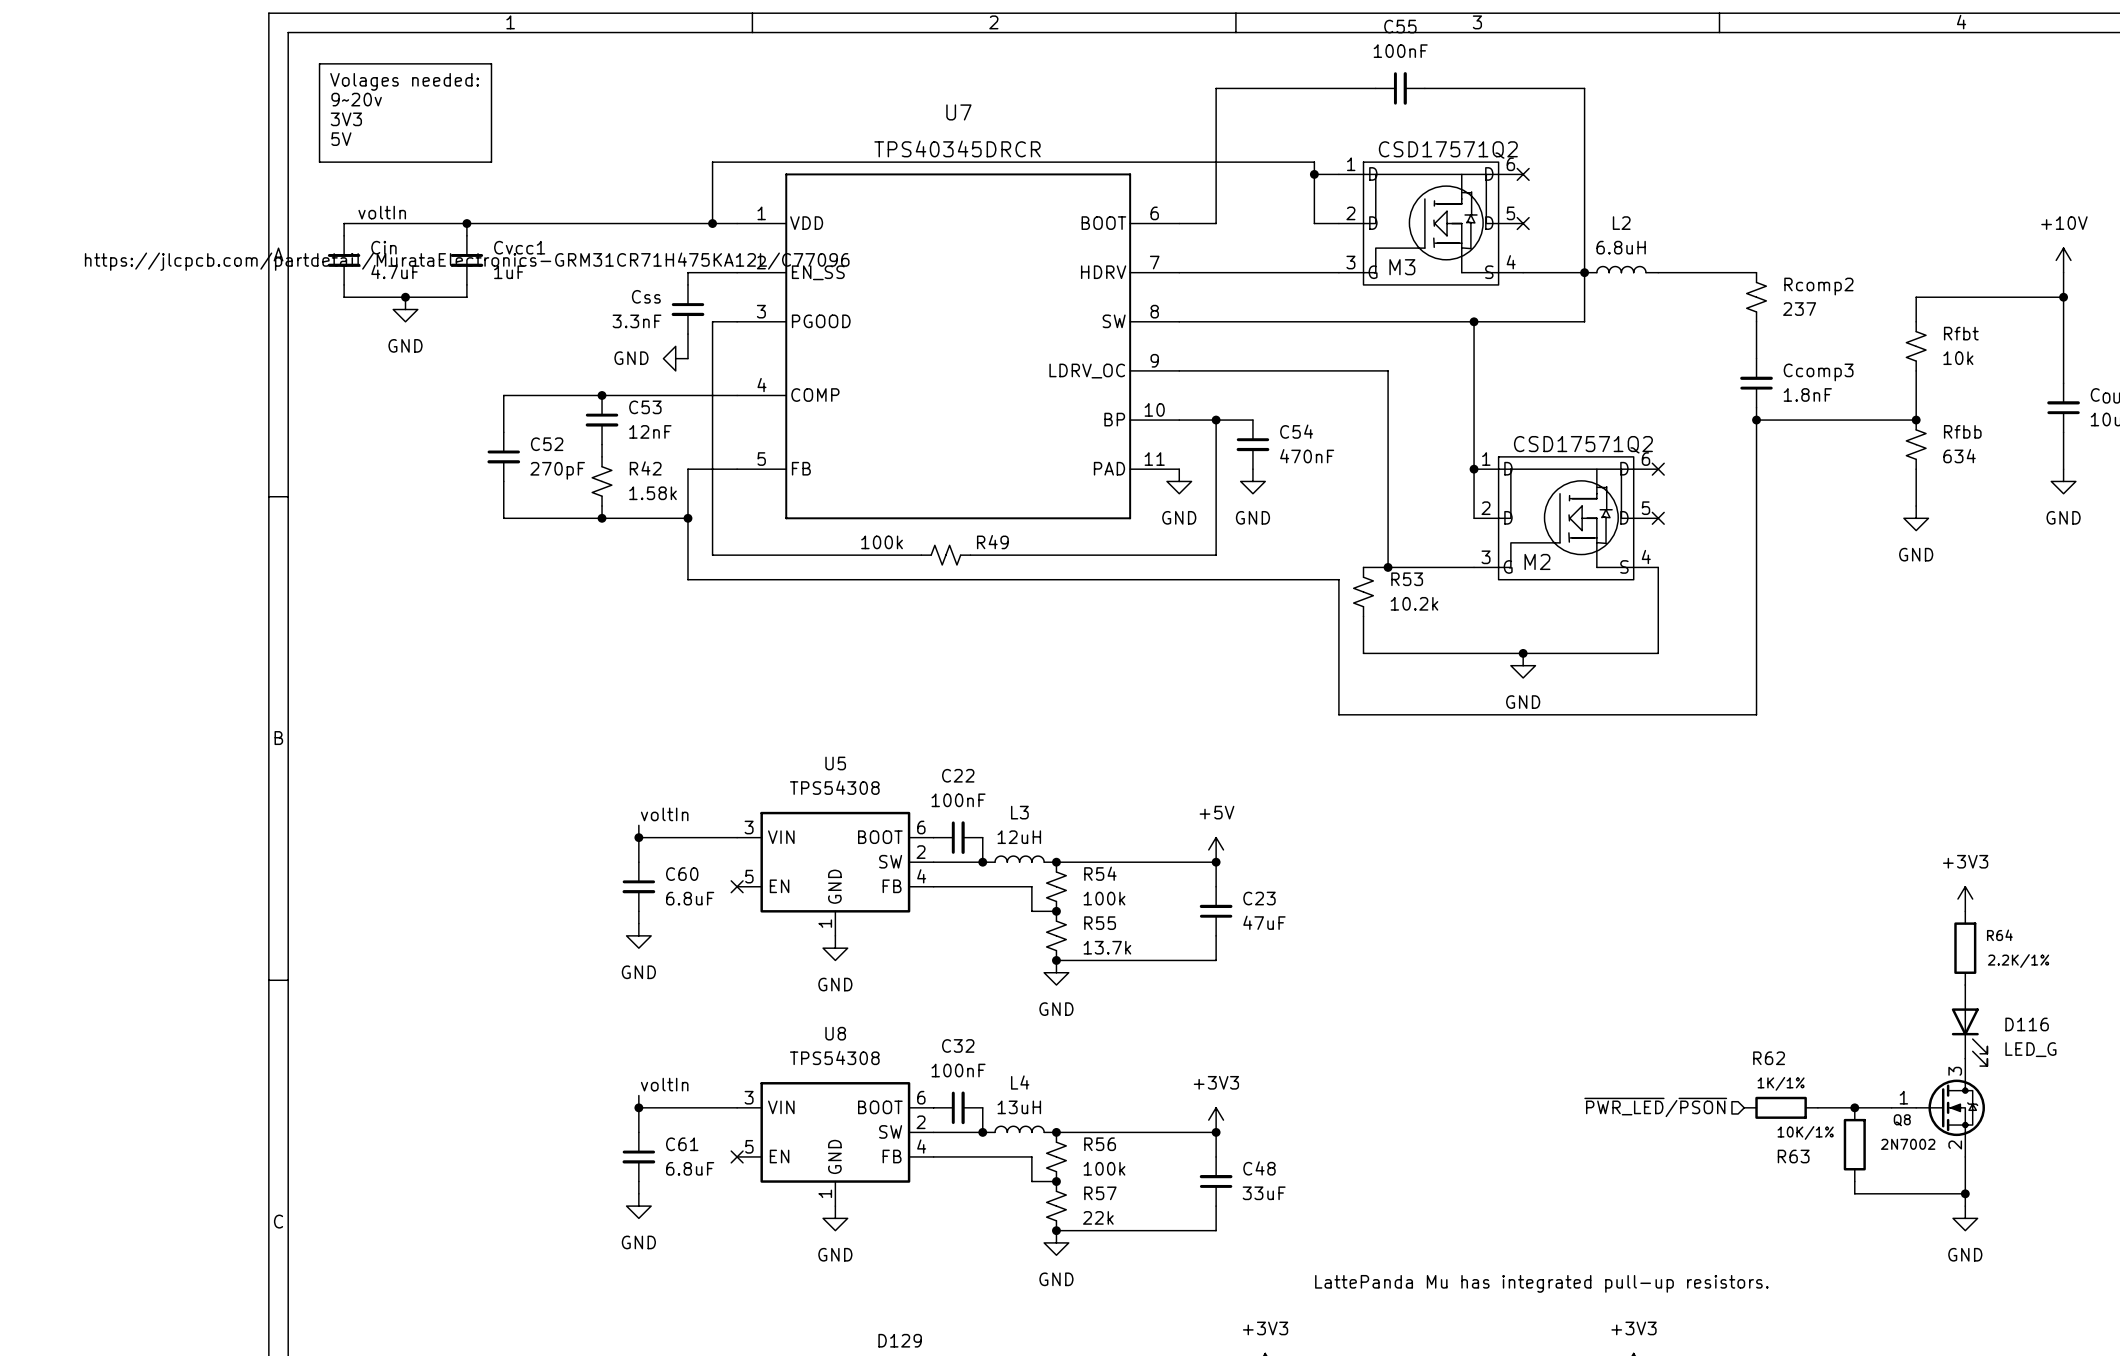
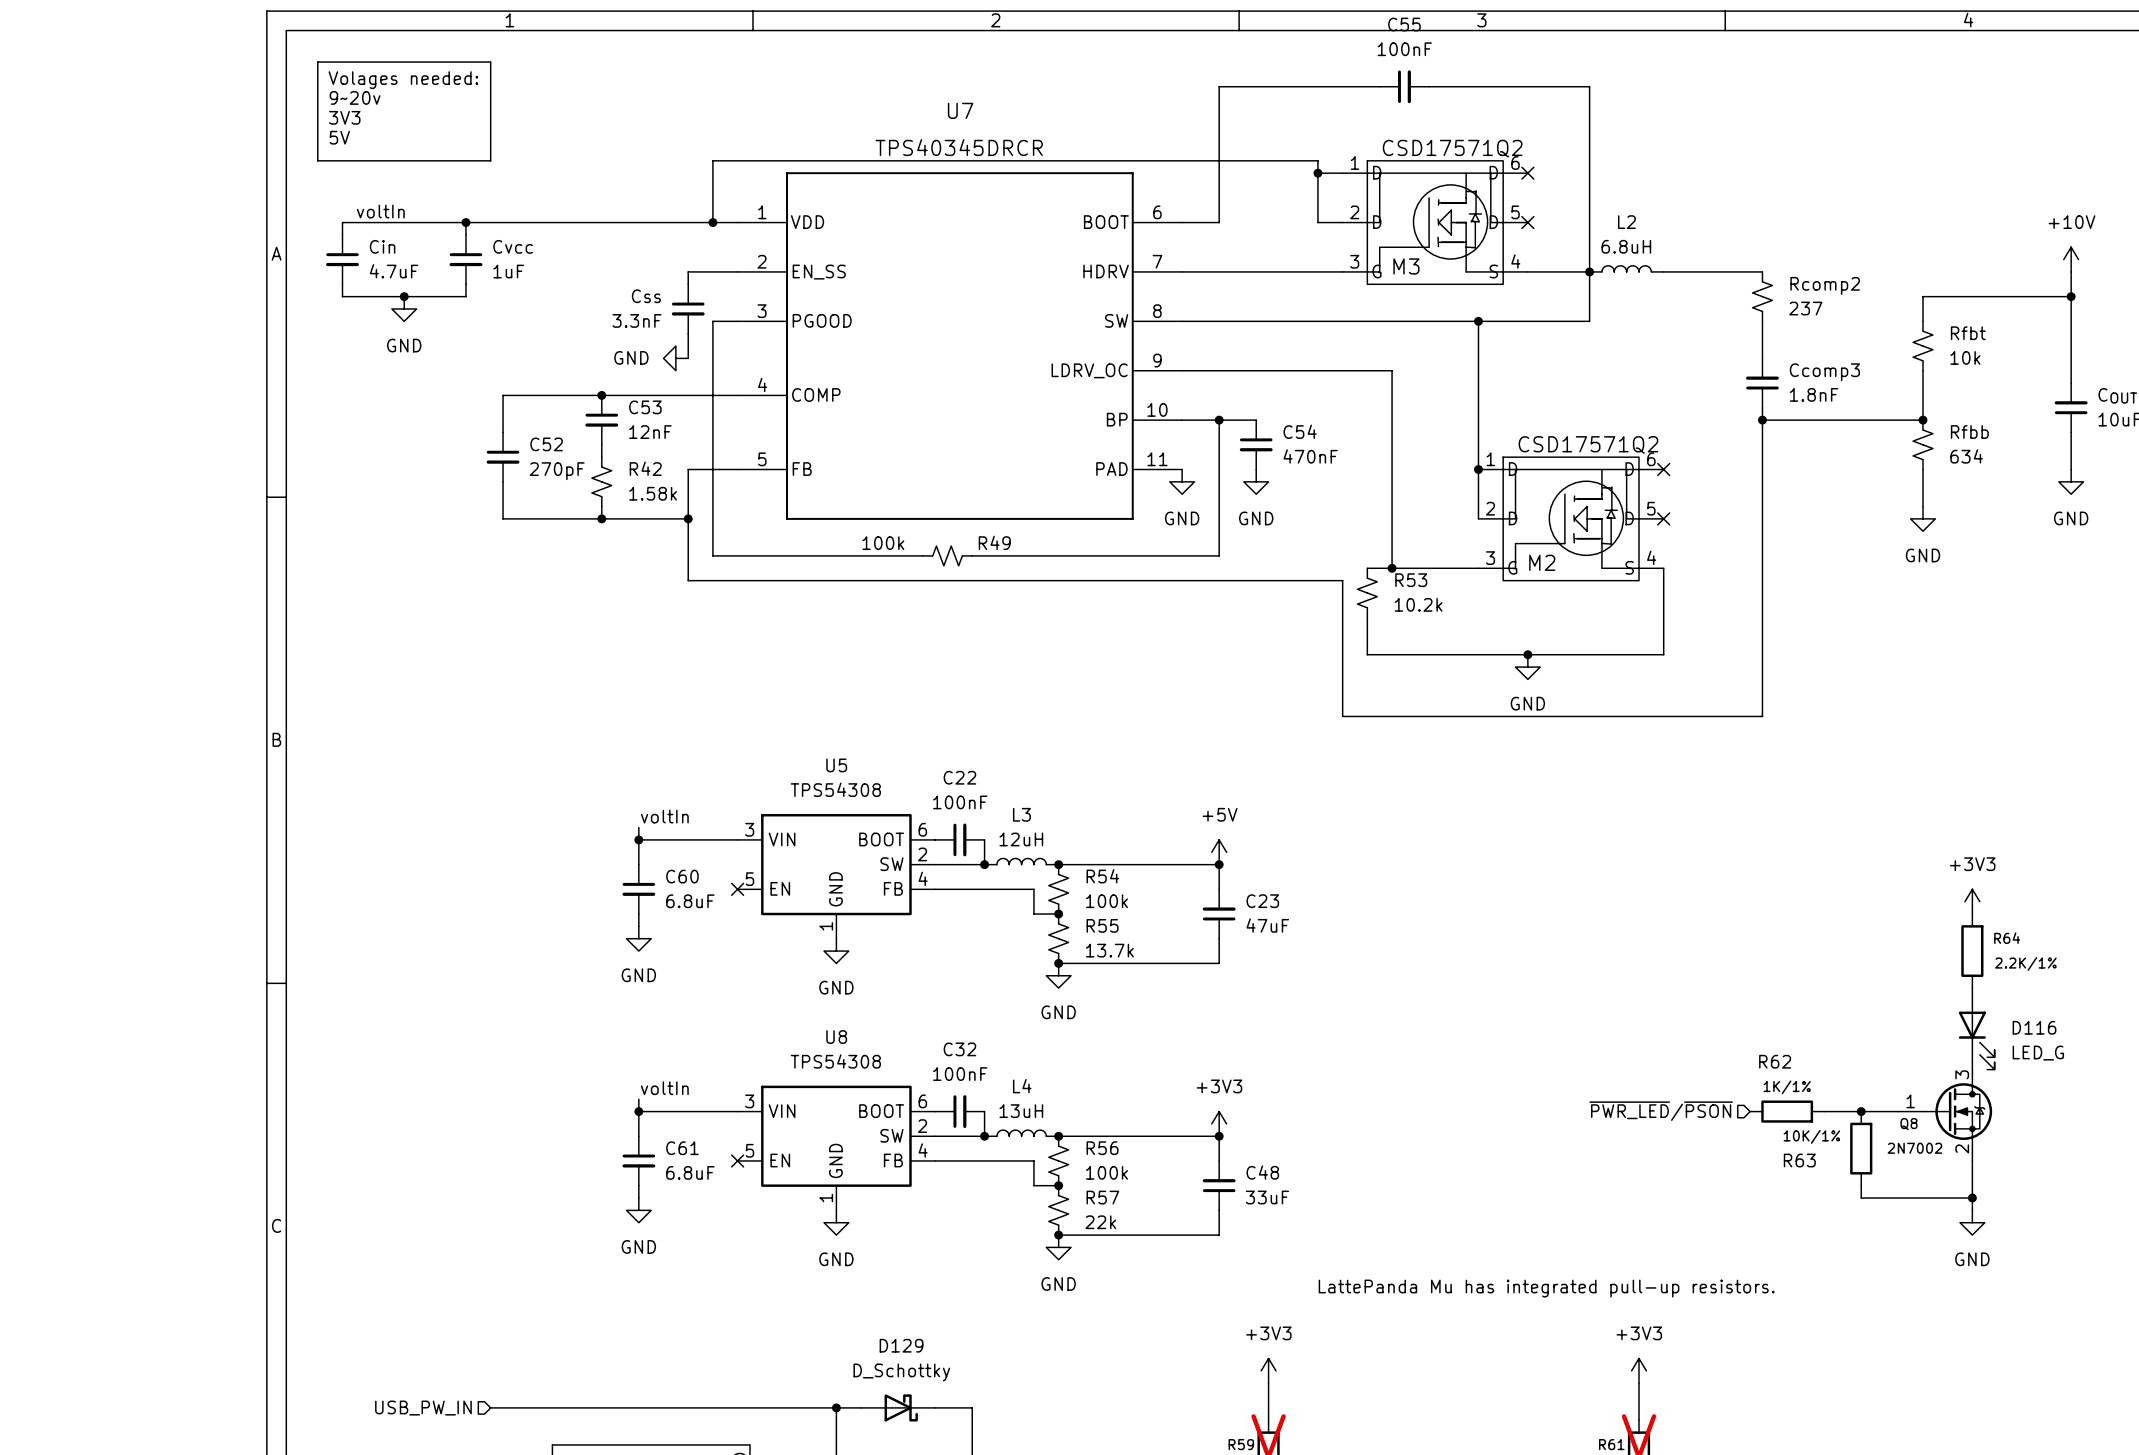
Cvcc1 name: Cvcc1 (519, 247) -> Cvcc (513, 246)
Cvcc1 text: https://jlcpcb.com/partdetail/MurataElectronics-GRM31CR71H475KA12L/C77096 (467, 261) -> none

